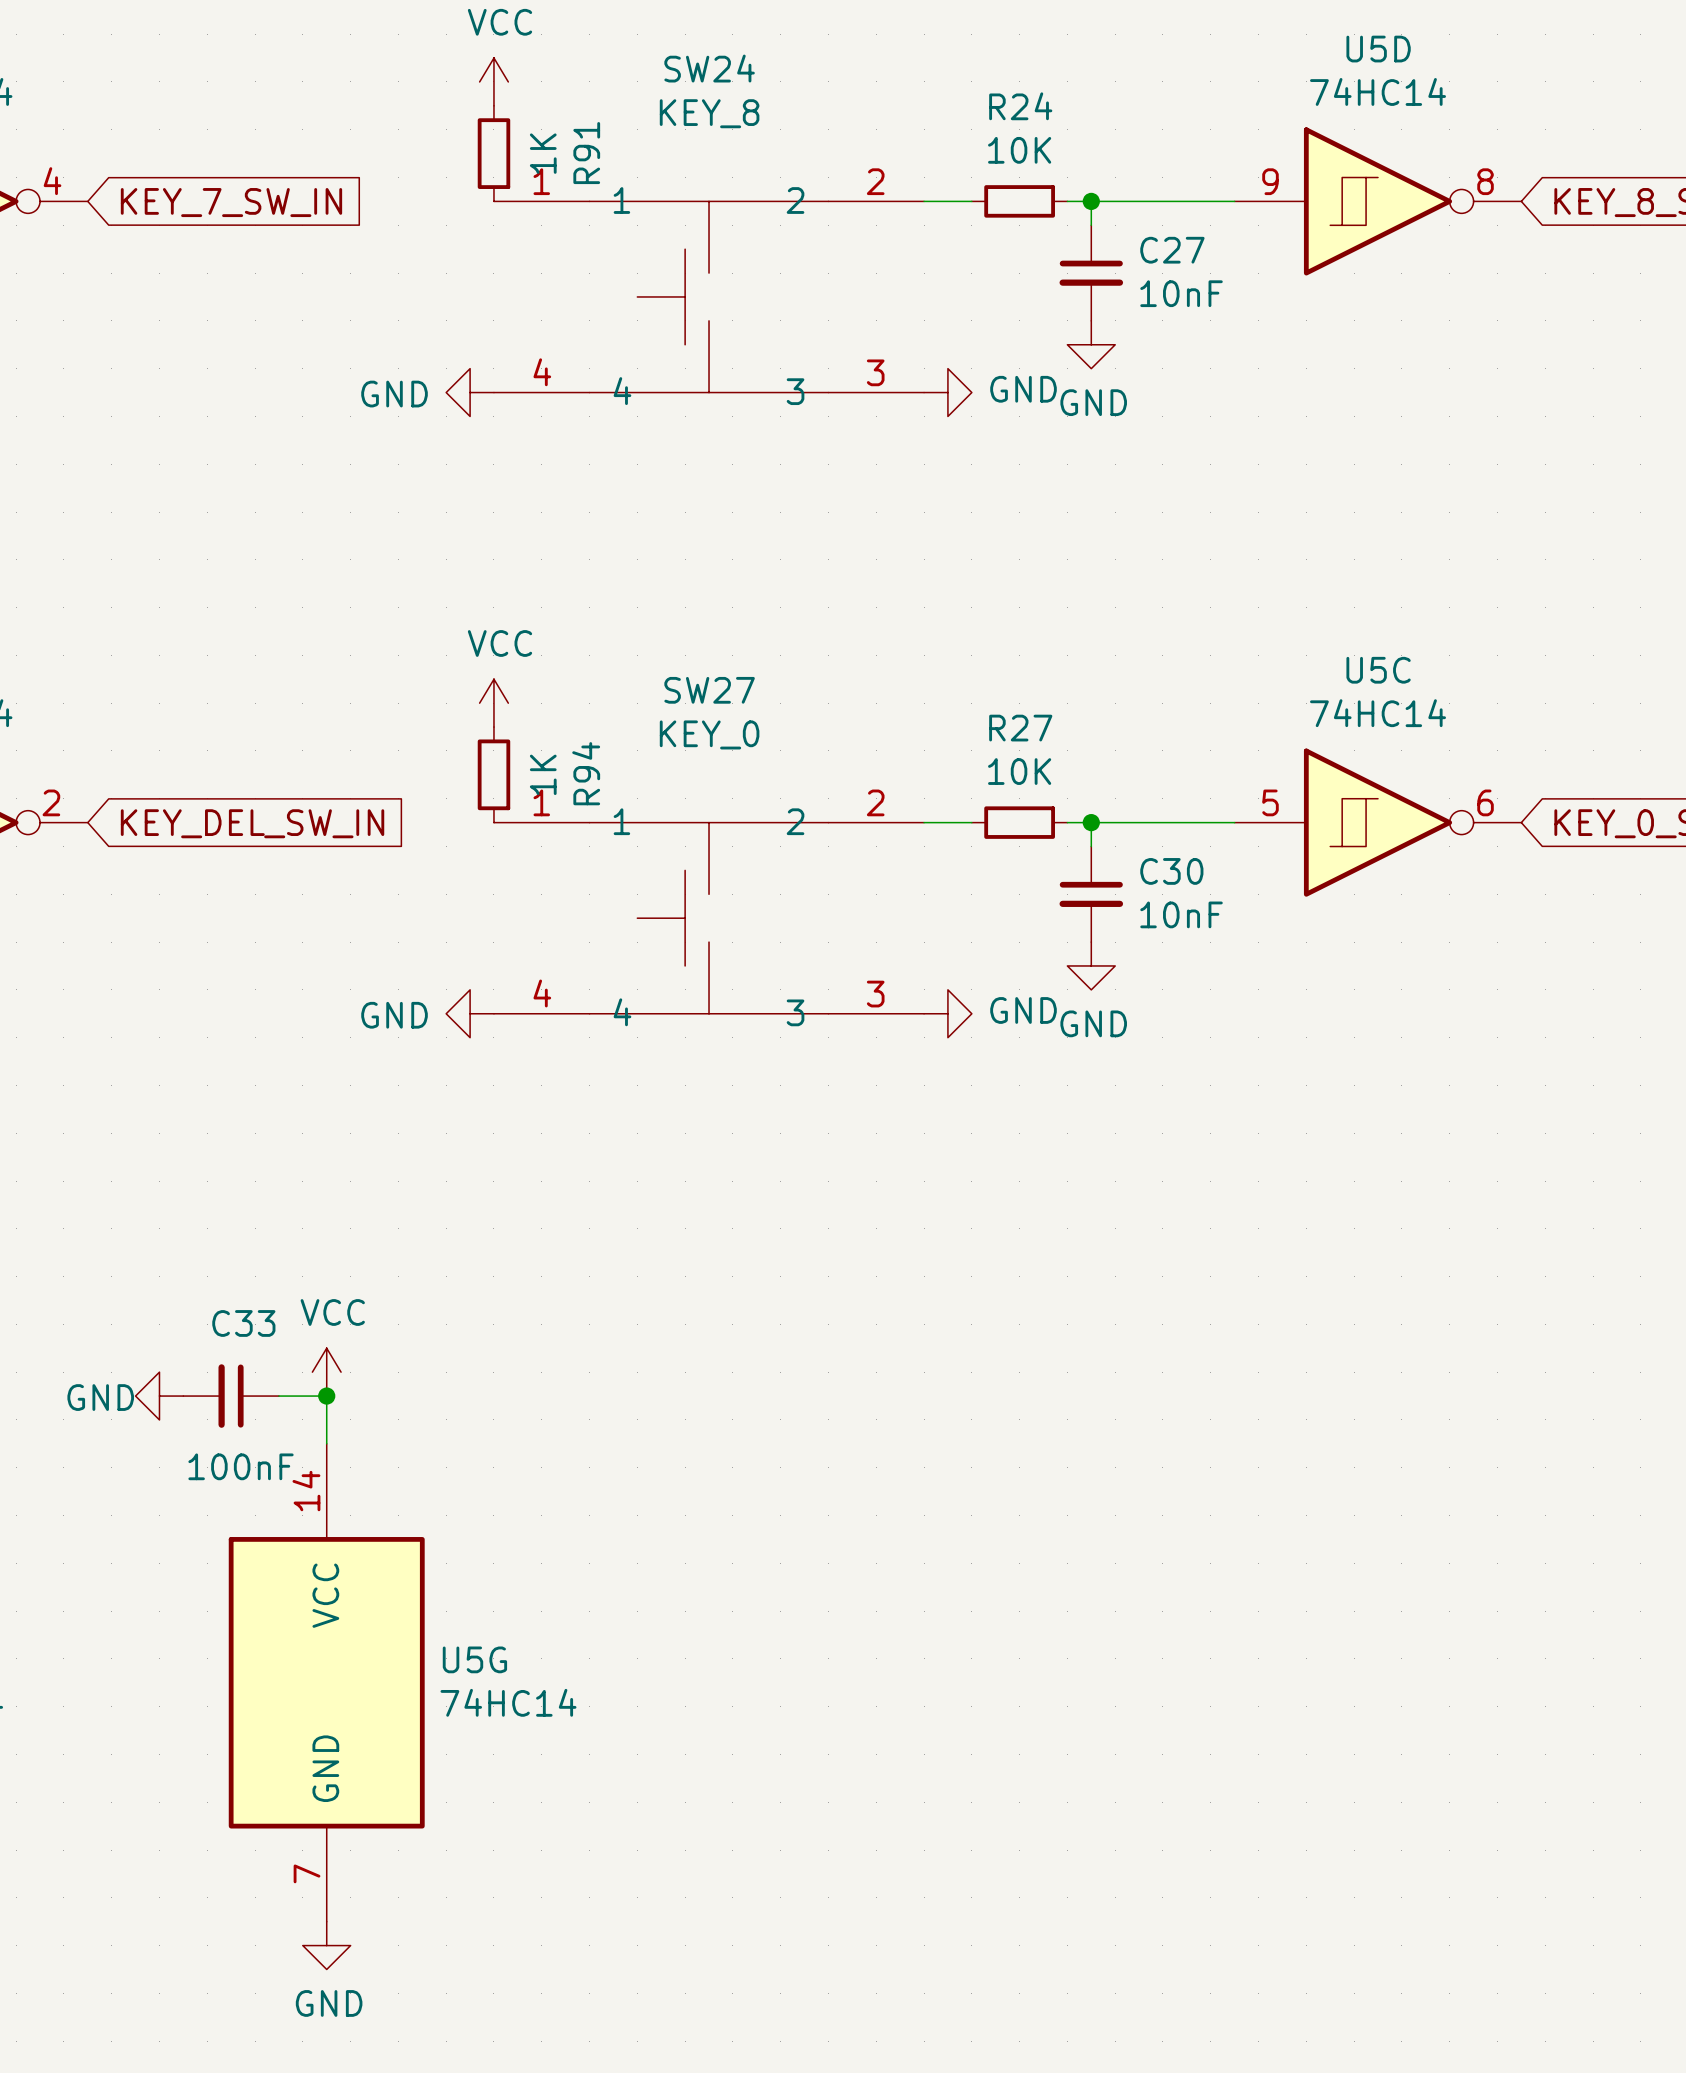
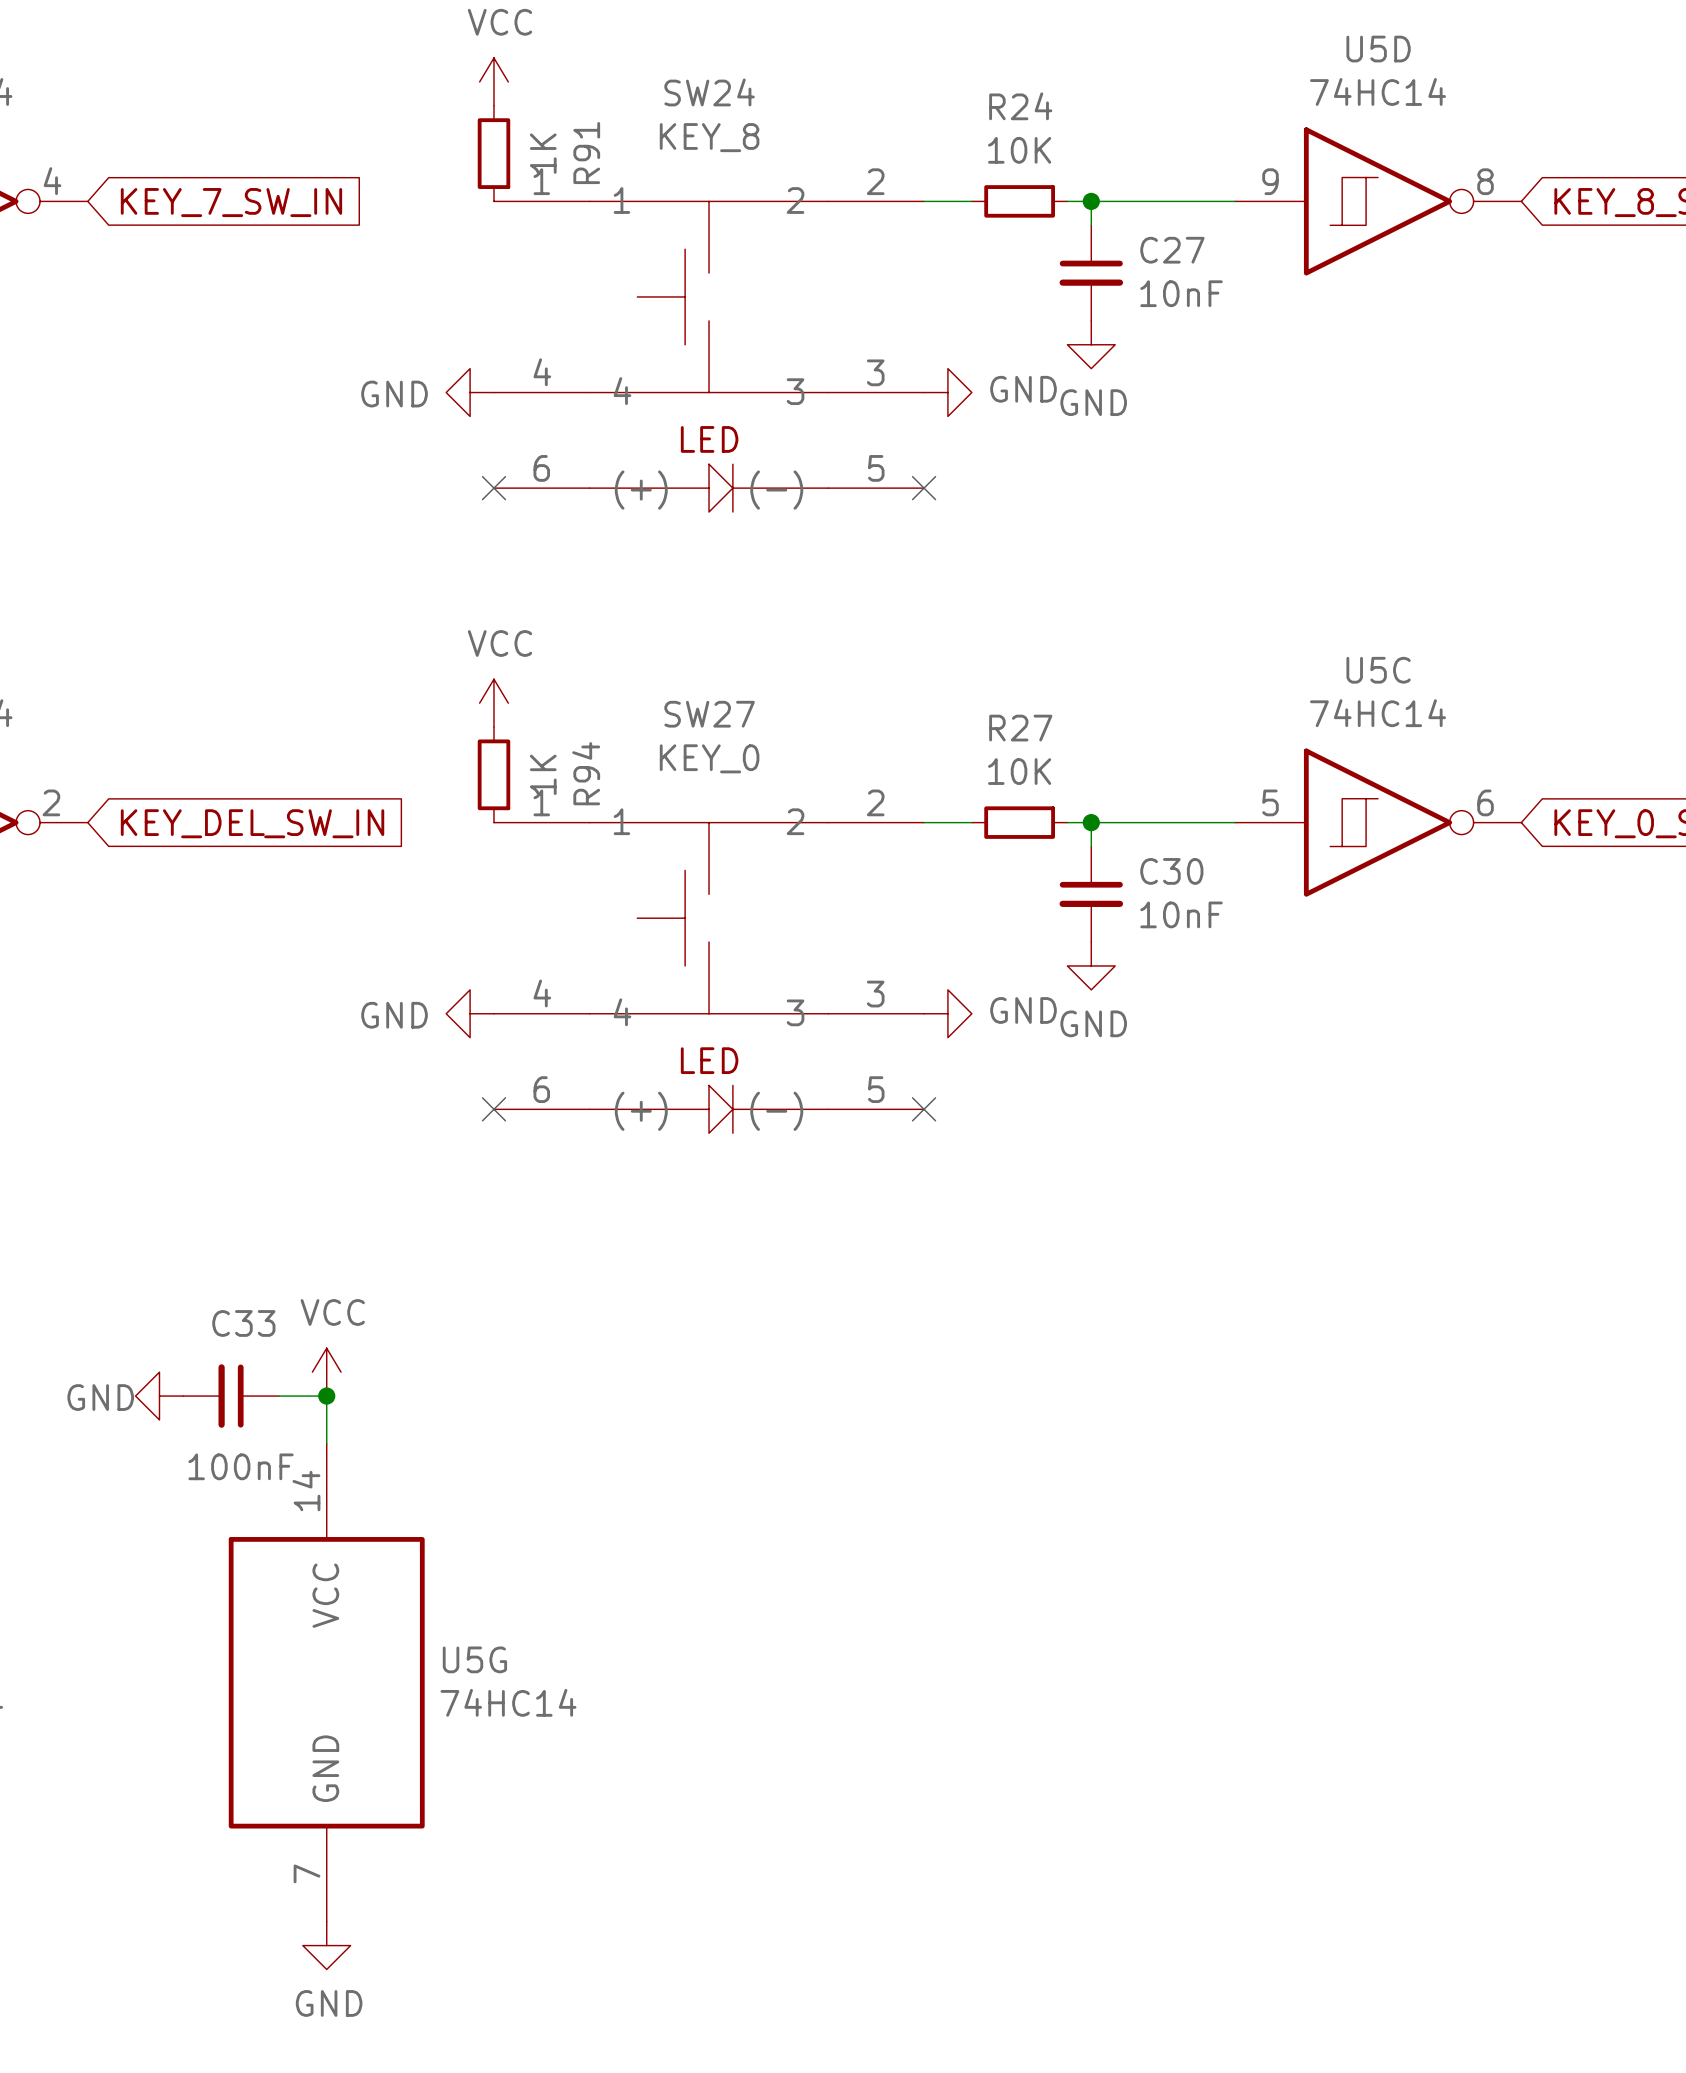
SW24 symbol: [493, 201, 925, 393] -> [493, 201, 925, 513]
no-connect mark: none -> (493, 488)
no-connect mark: none -> (924, 488)
SW27 symbol: [493, 822, 925, 1014] -> [493, 822, 925, 1134]
no-connect mark: none -> (493, 1109)
no-connect mark: none -> (924, 1109)

